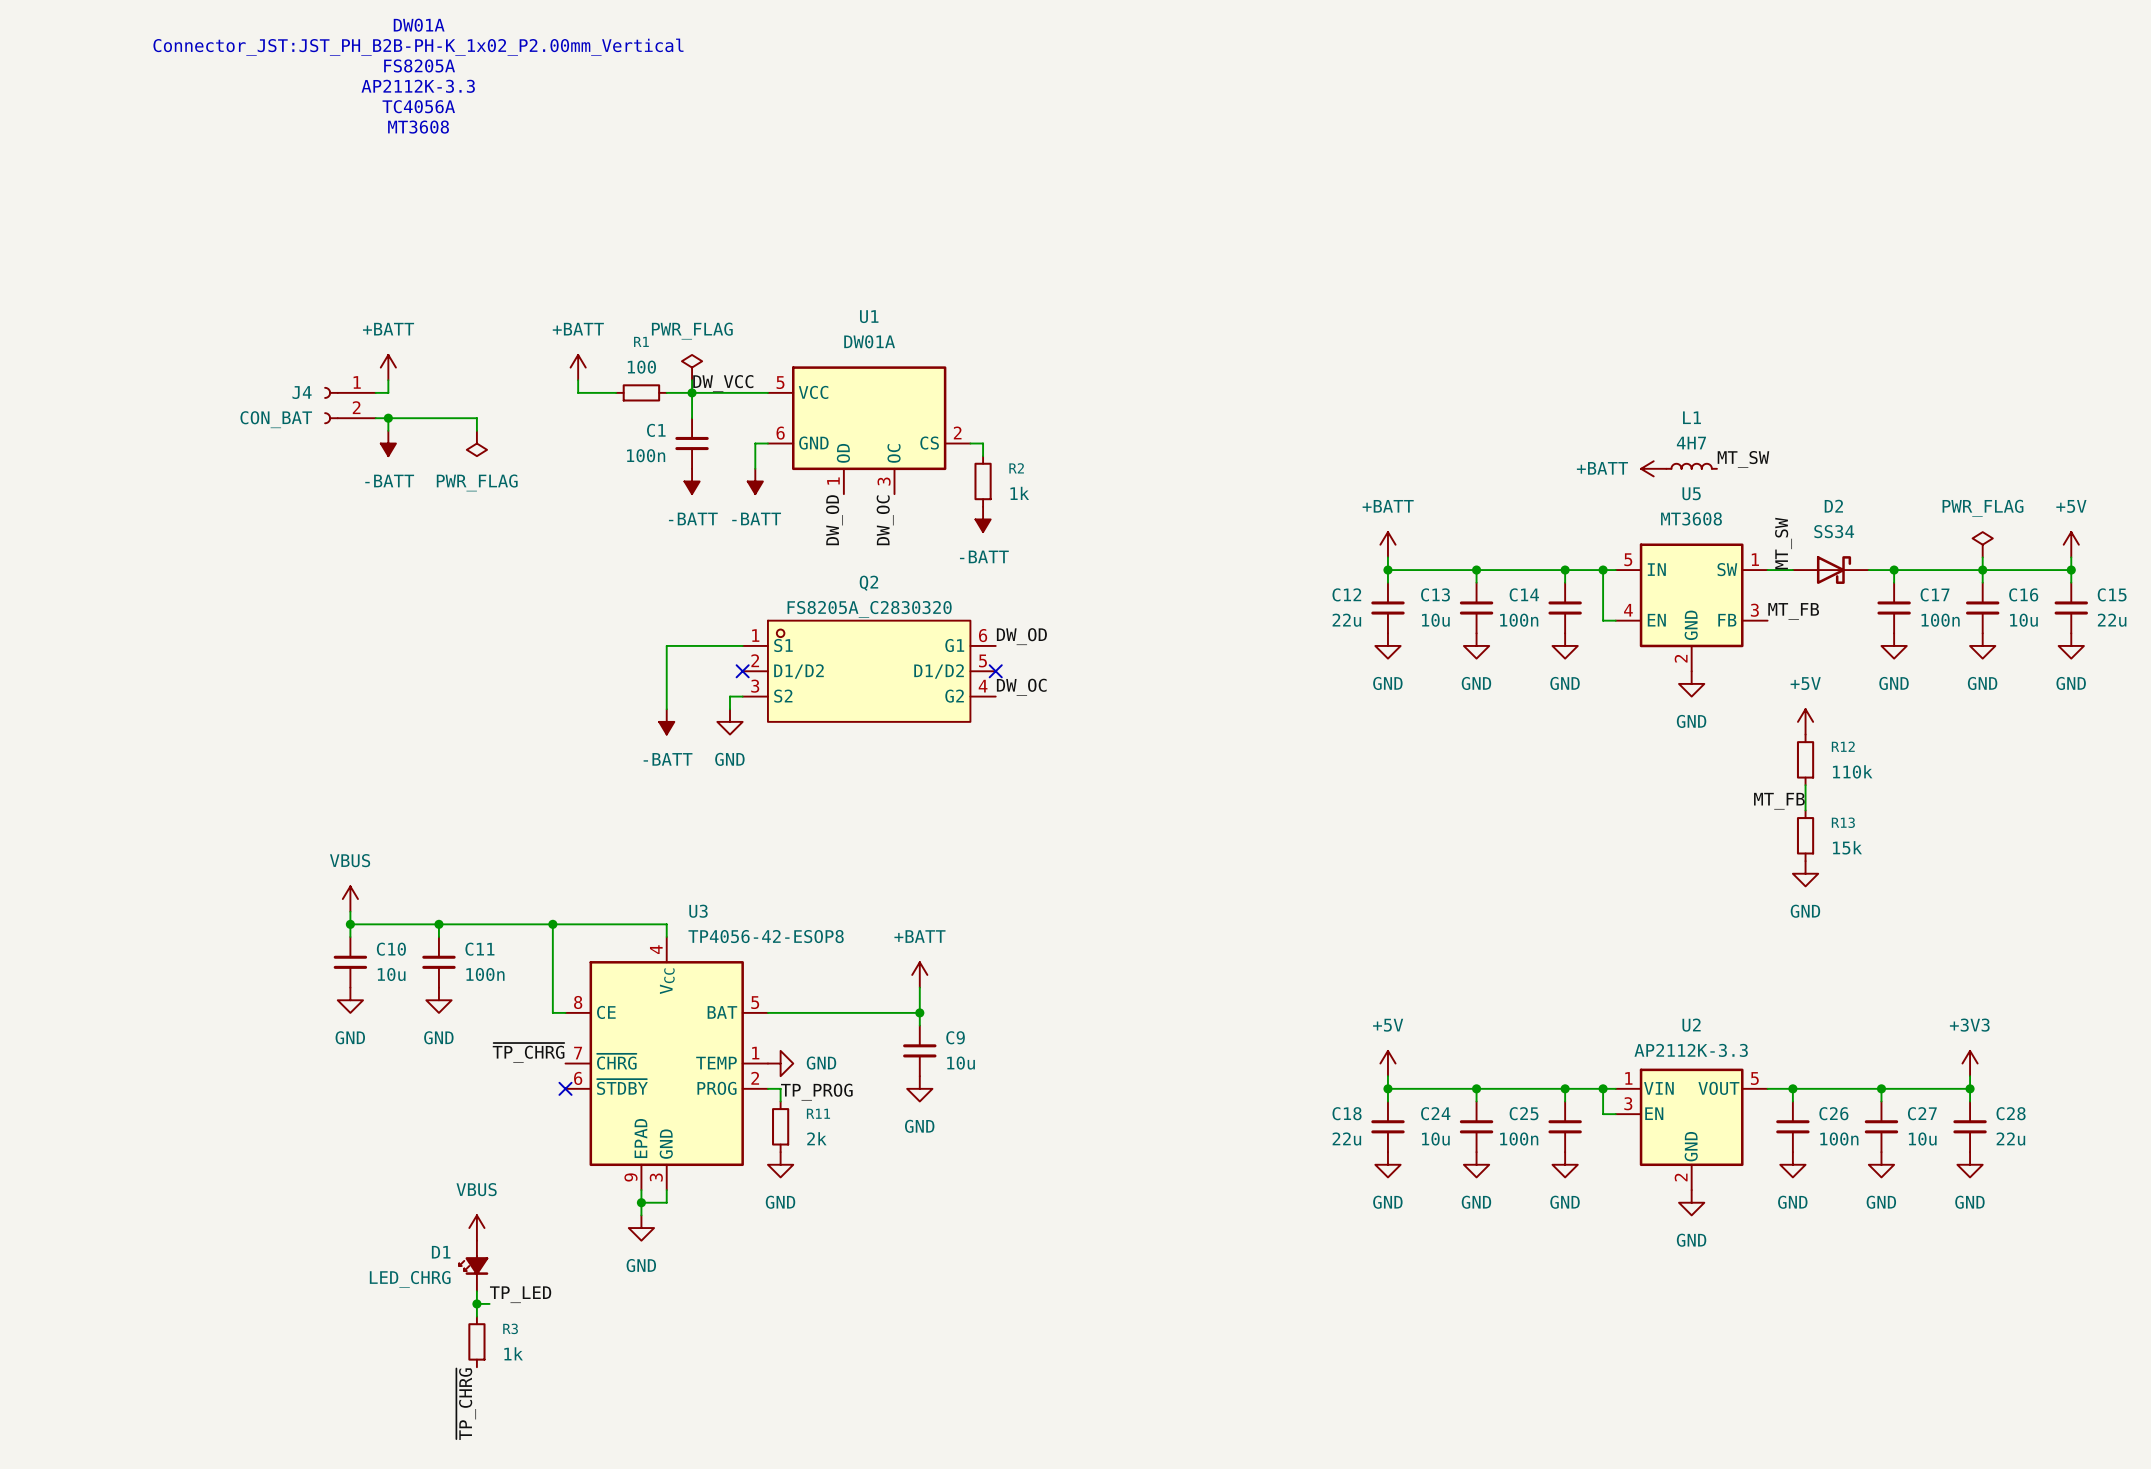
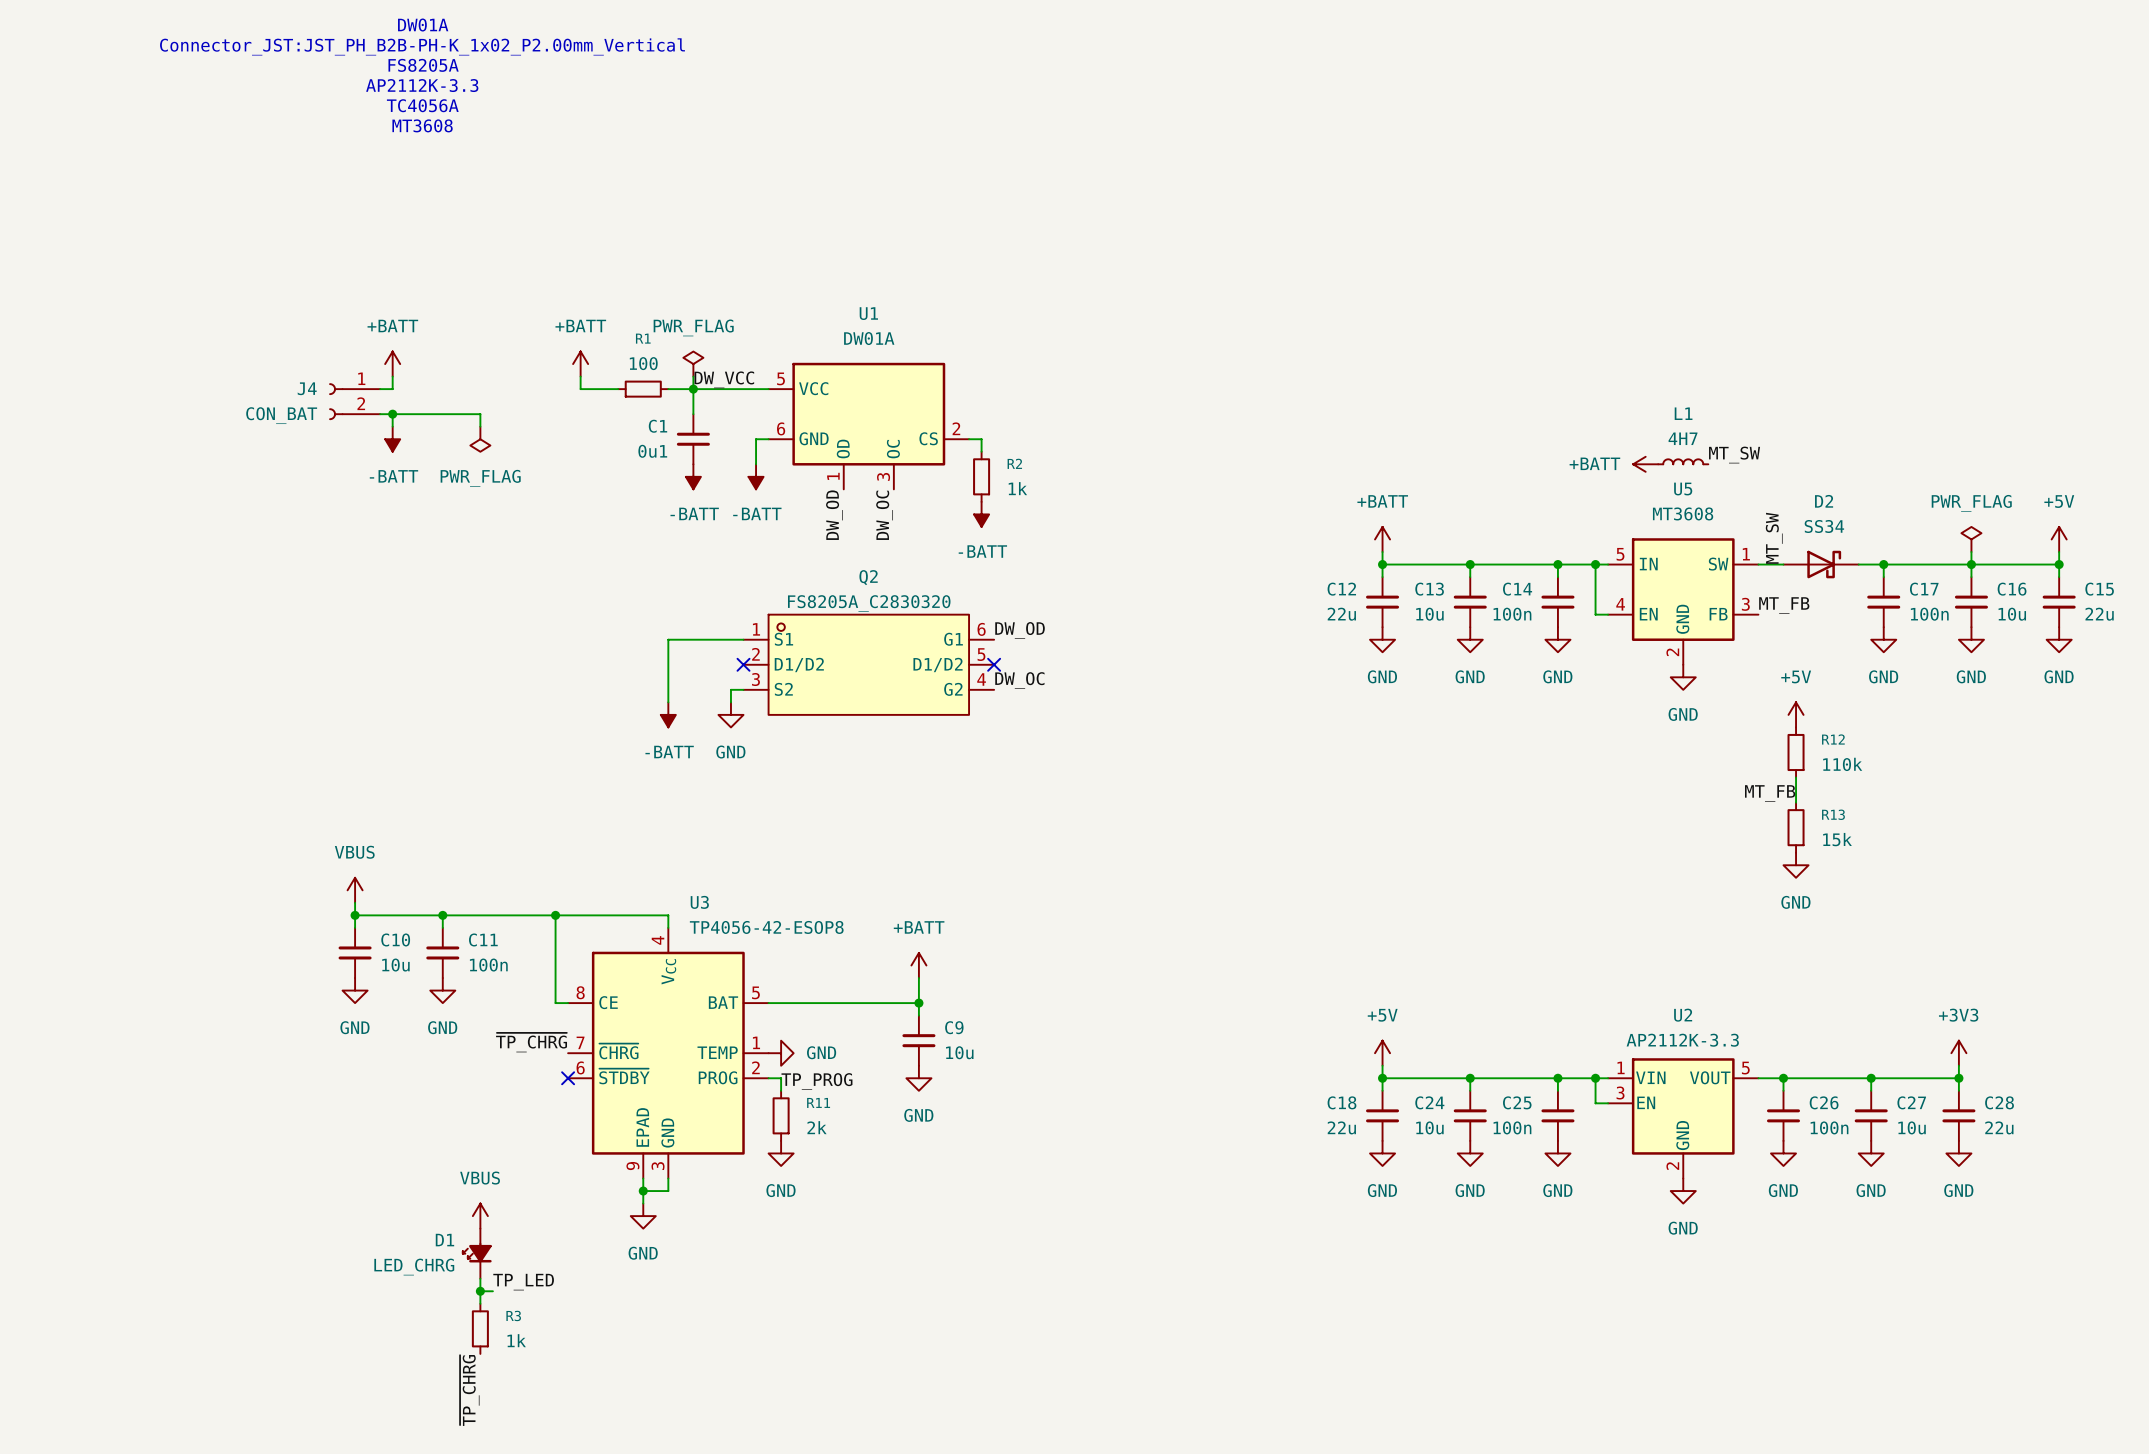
C1 value: 100n (646, 455) -> 0u1 (652, 451)

